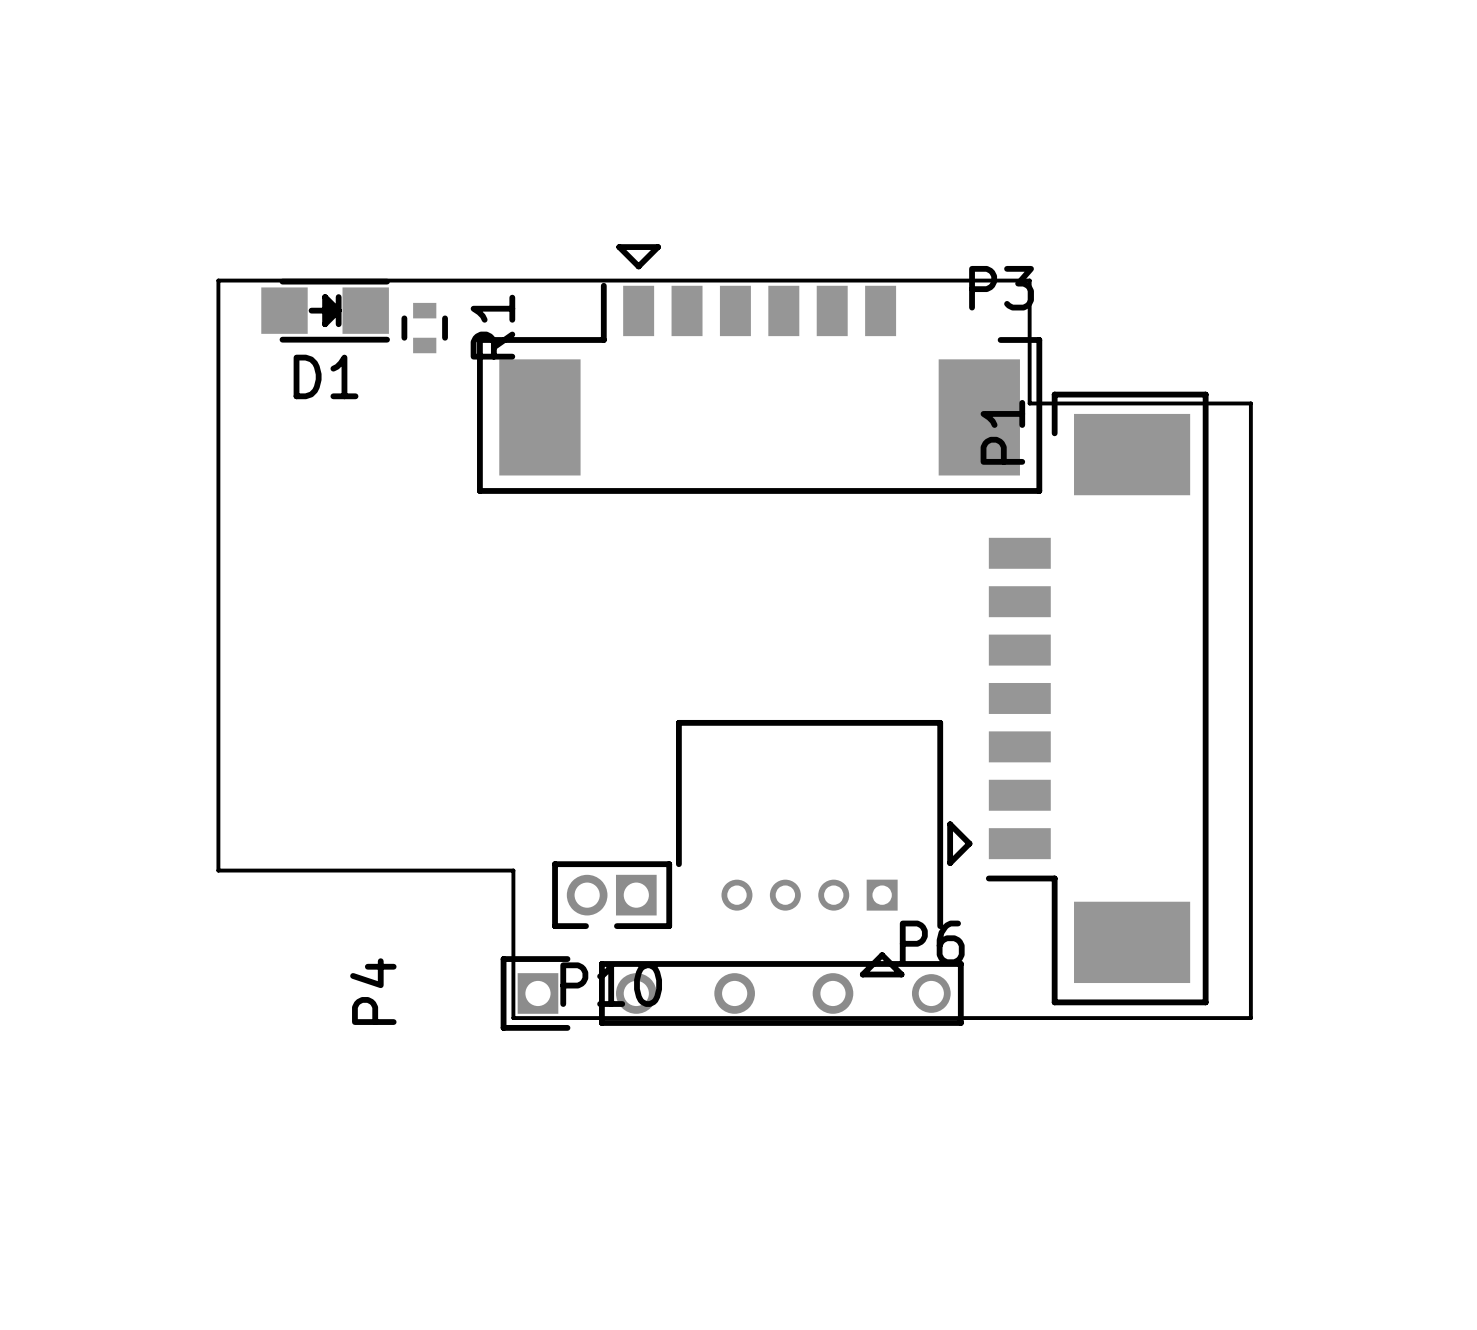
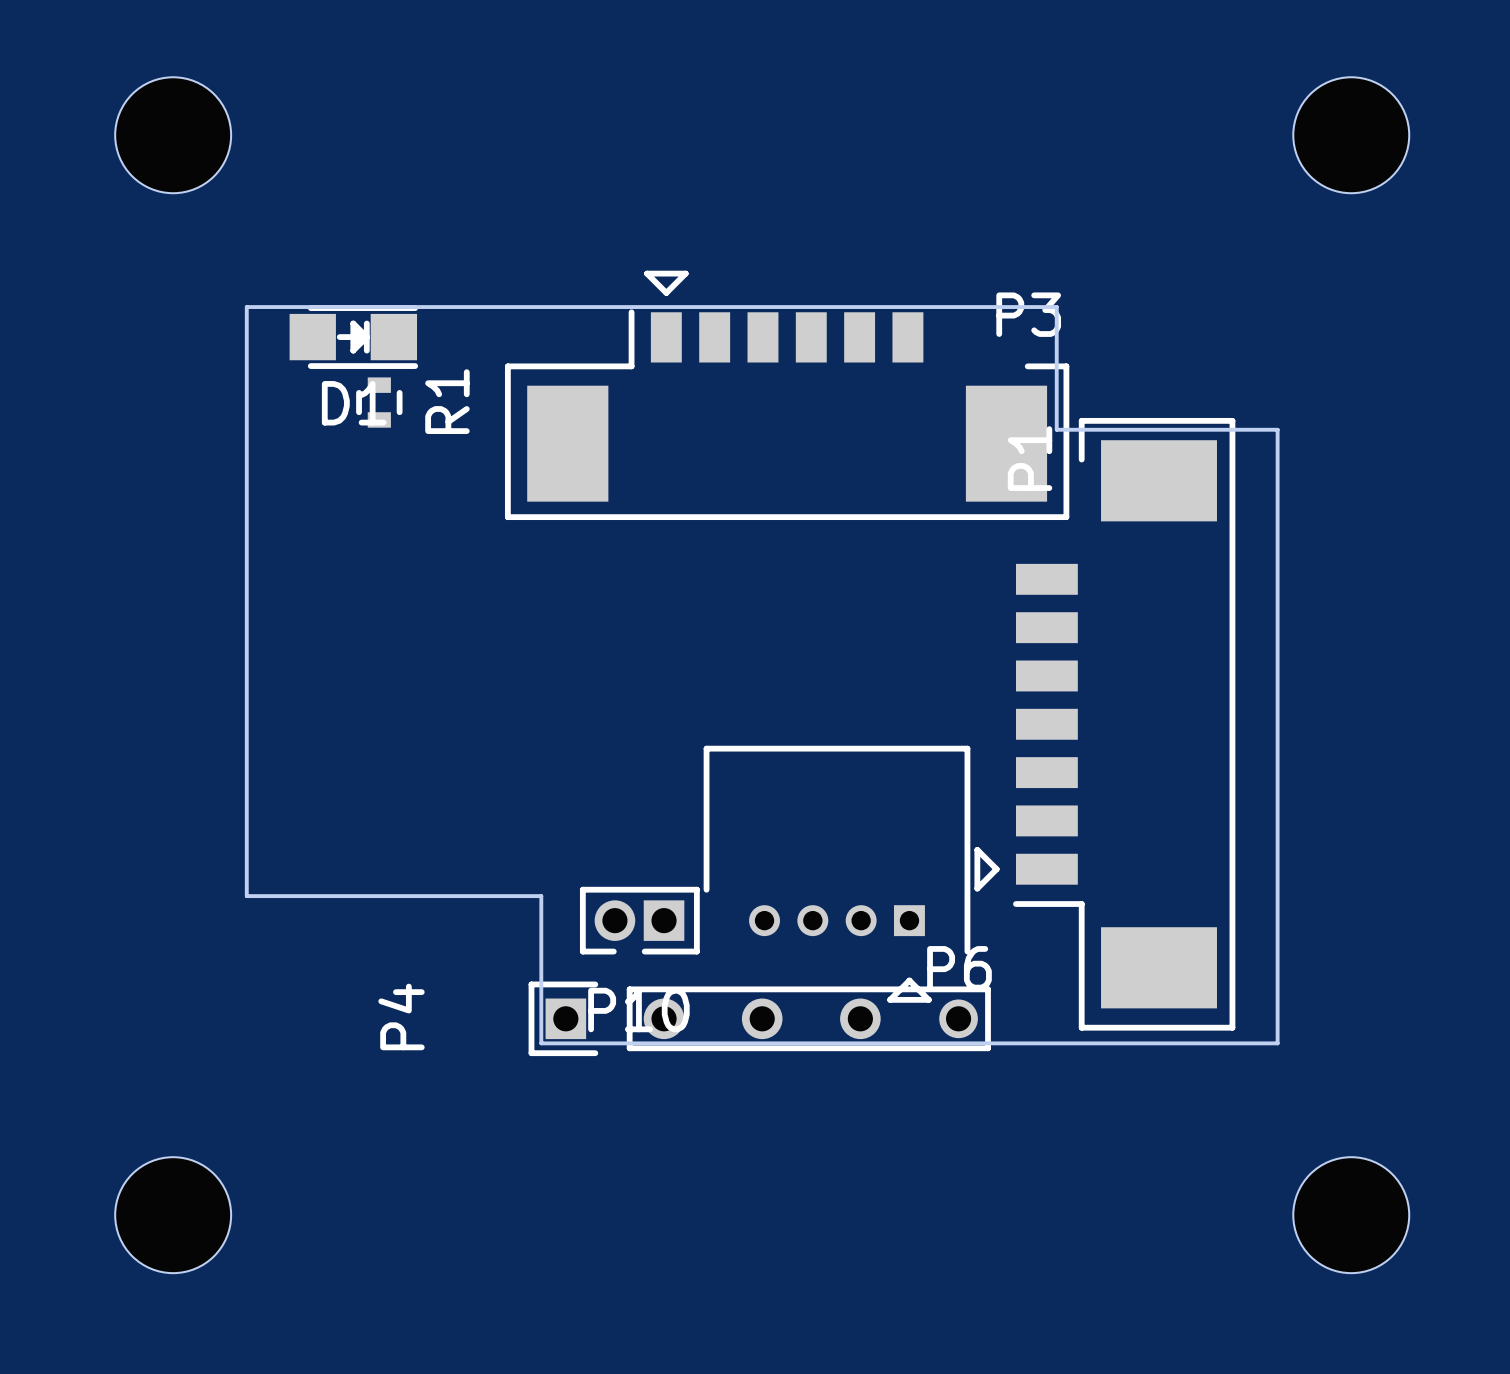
part: none -> (173, 135)
part: none -> (1351, 135)
R1 position: (424, 328) -> (379, 402)
part: none -> (173, 1215)
part: none -> (1351, 1215)

